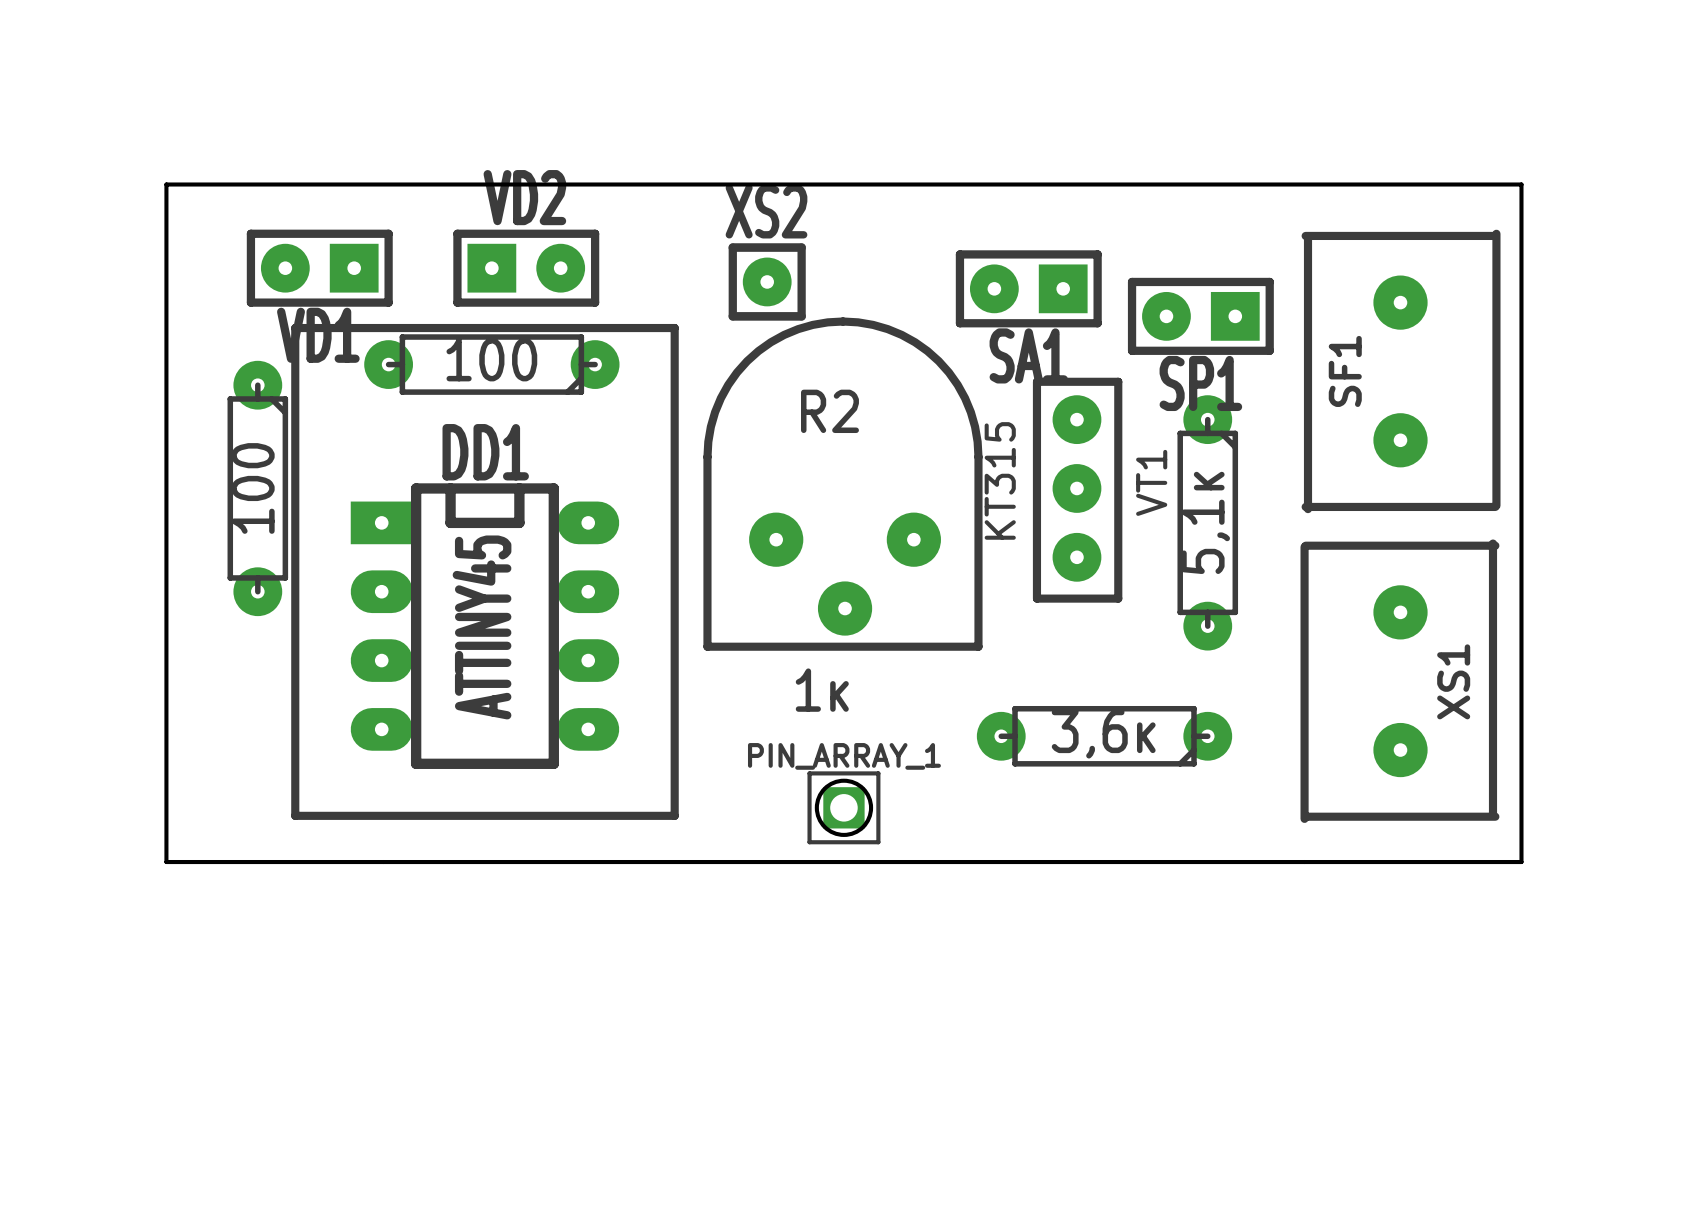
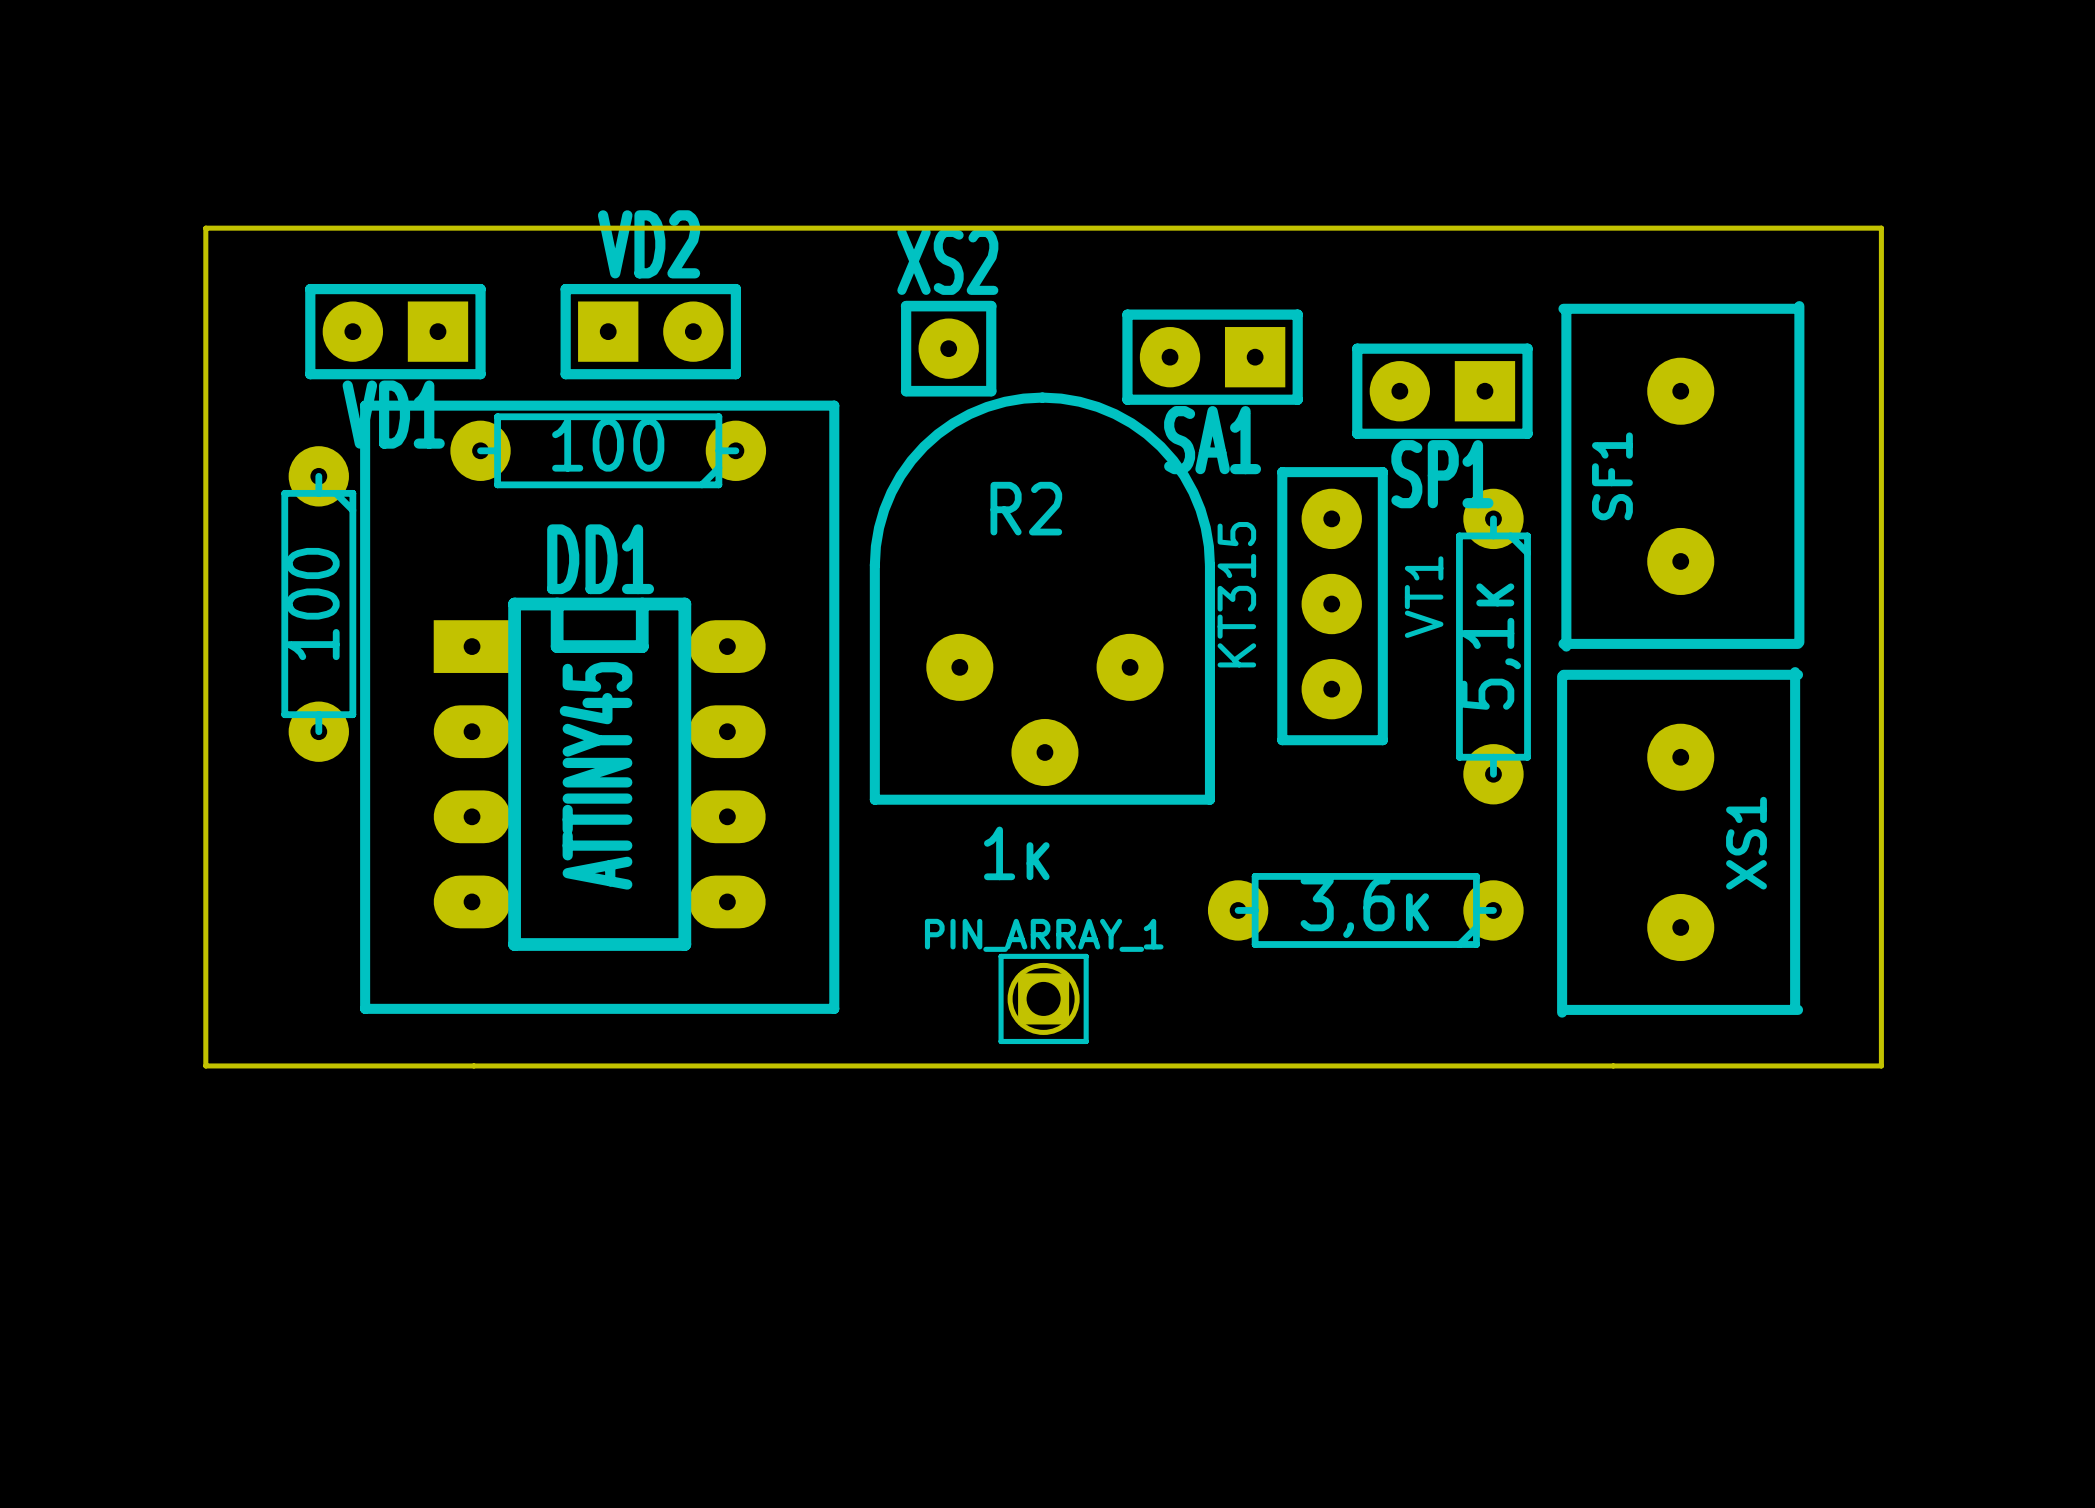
SA1 position: (1028, 288) -> (1212, 357)
SP1 position: (1200, 316) -> (1442, 391)
SF1 position: (1401, 371) -> (1681, 476)
XS1 position: (1399, 681) -> (1680, 842)

